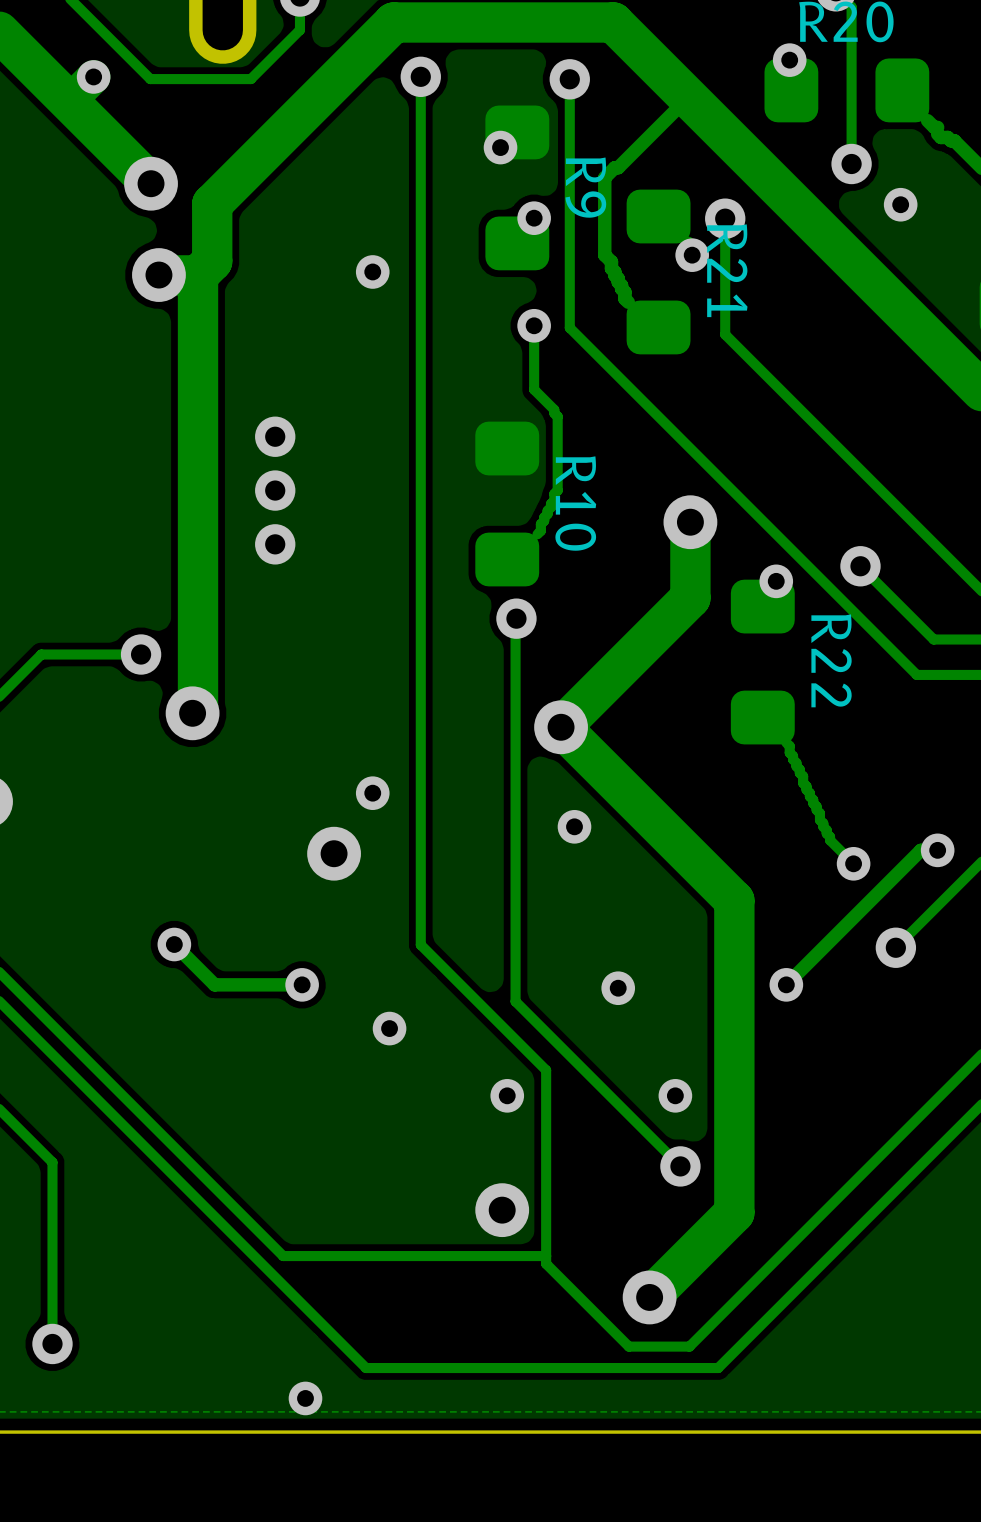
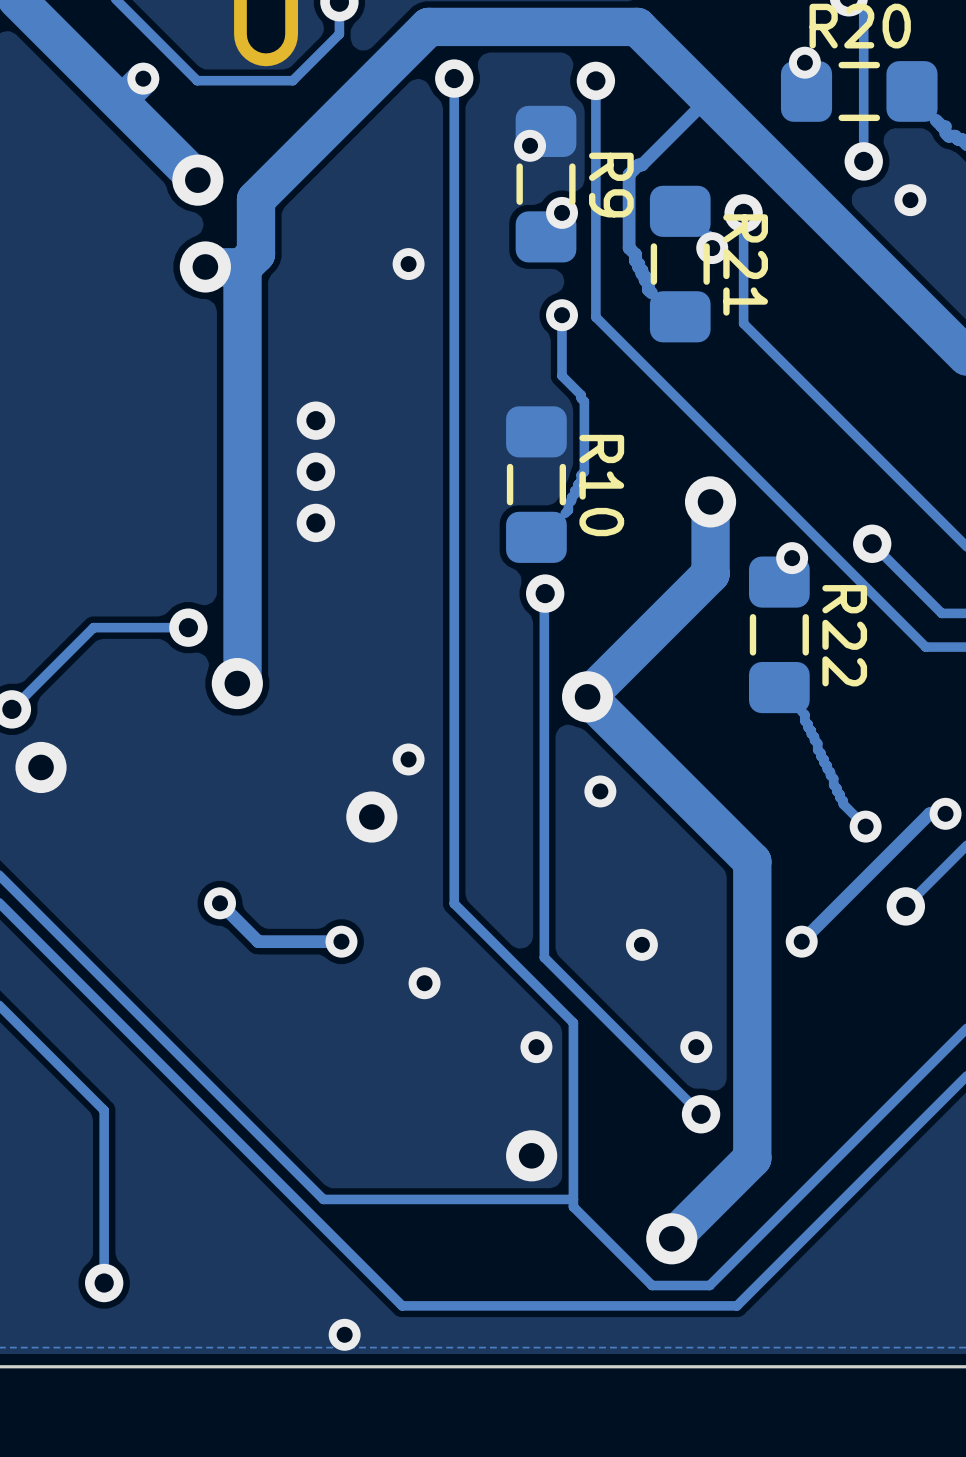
line: none -> (876, 65) (841, 65)
line: none -> (876, 117) (841, 117)
line: none -> (519, 166) (519, 201)
line: none -> (572, 166) (572, 201)
line: none -> (653, 246) (653, 281)
line: none -> (706, 246) (706, 281)
line: none -> (510, 467) (510, 502)
line: none -> (562, 467) (562, 502)
line: none -> (752, 617) (752, 652)
line: none -> (805, 617) (805, 652)

